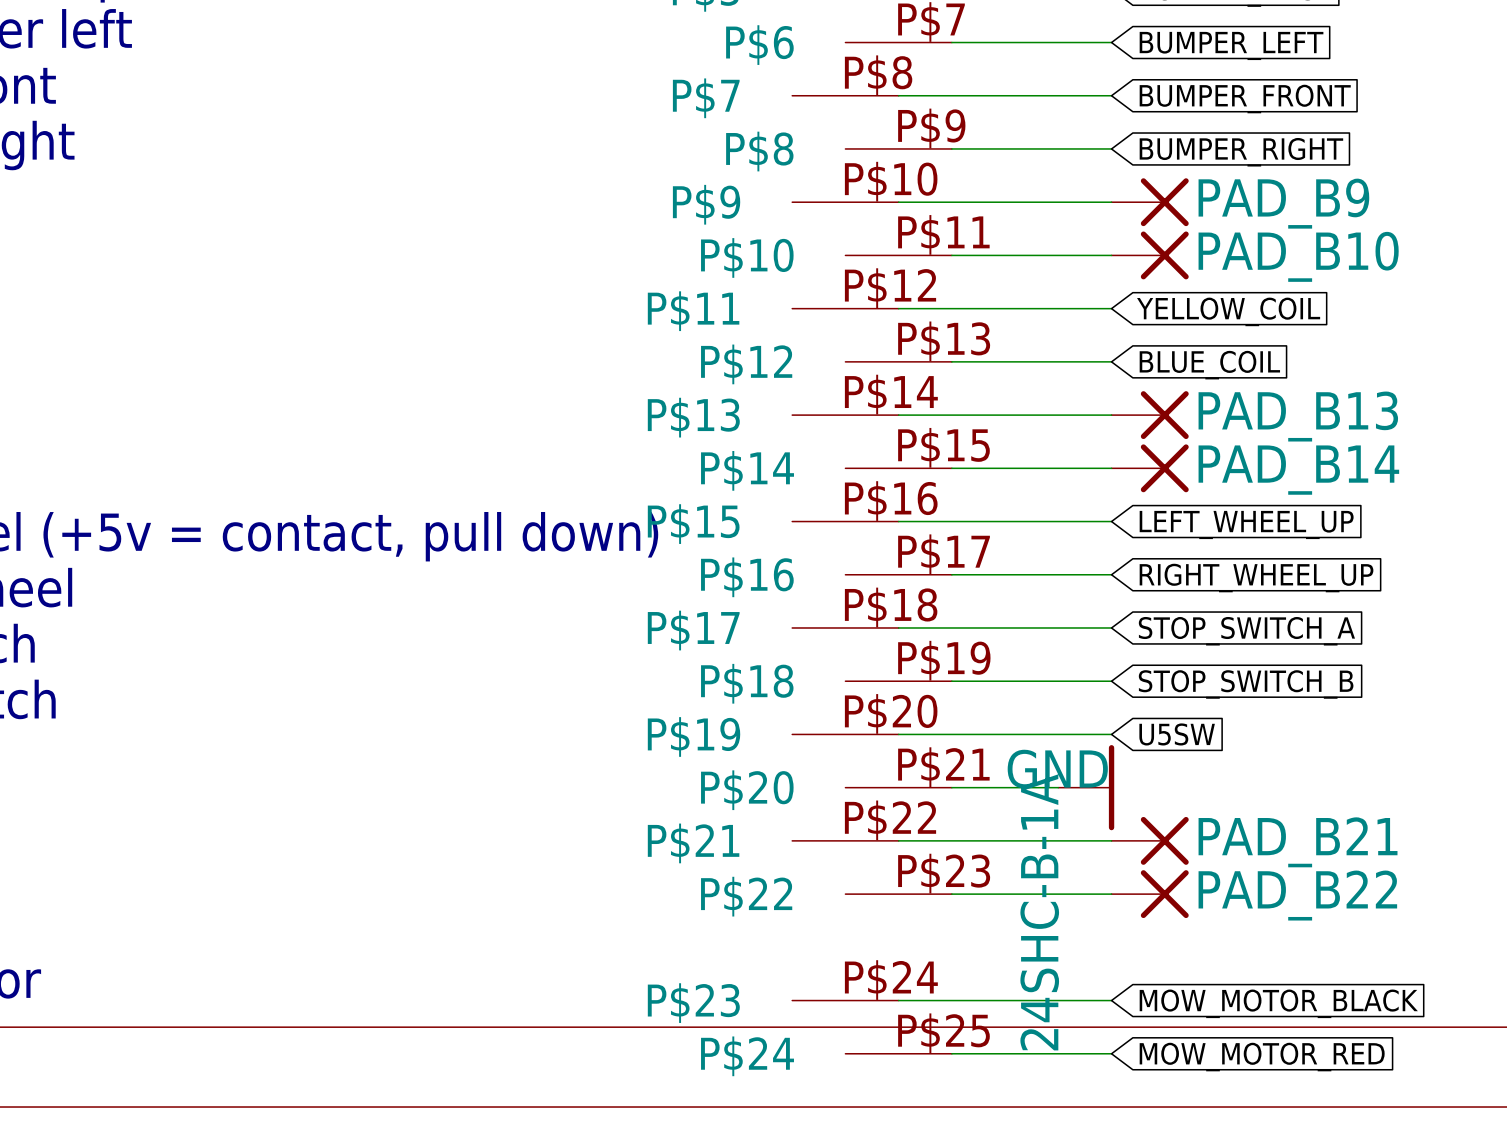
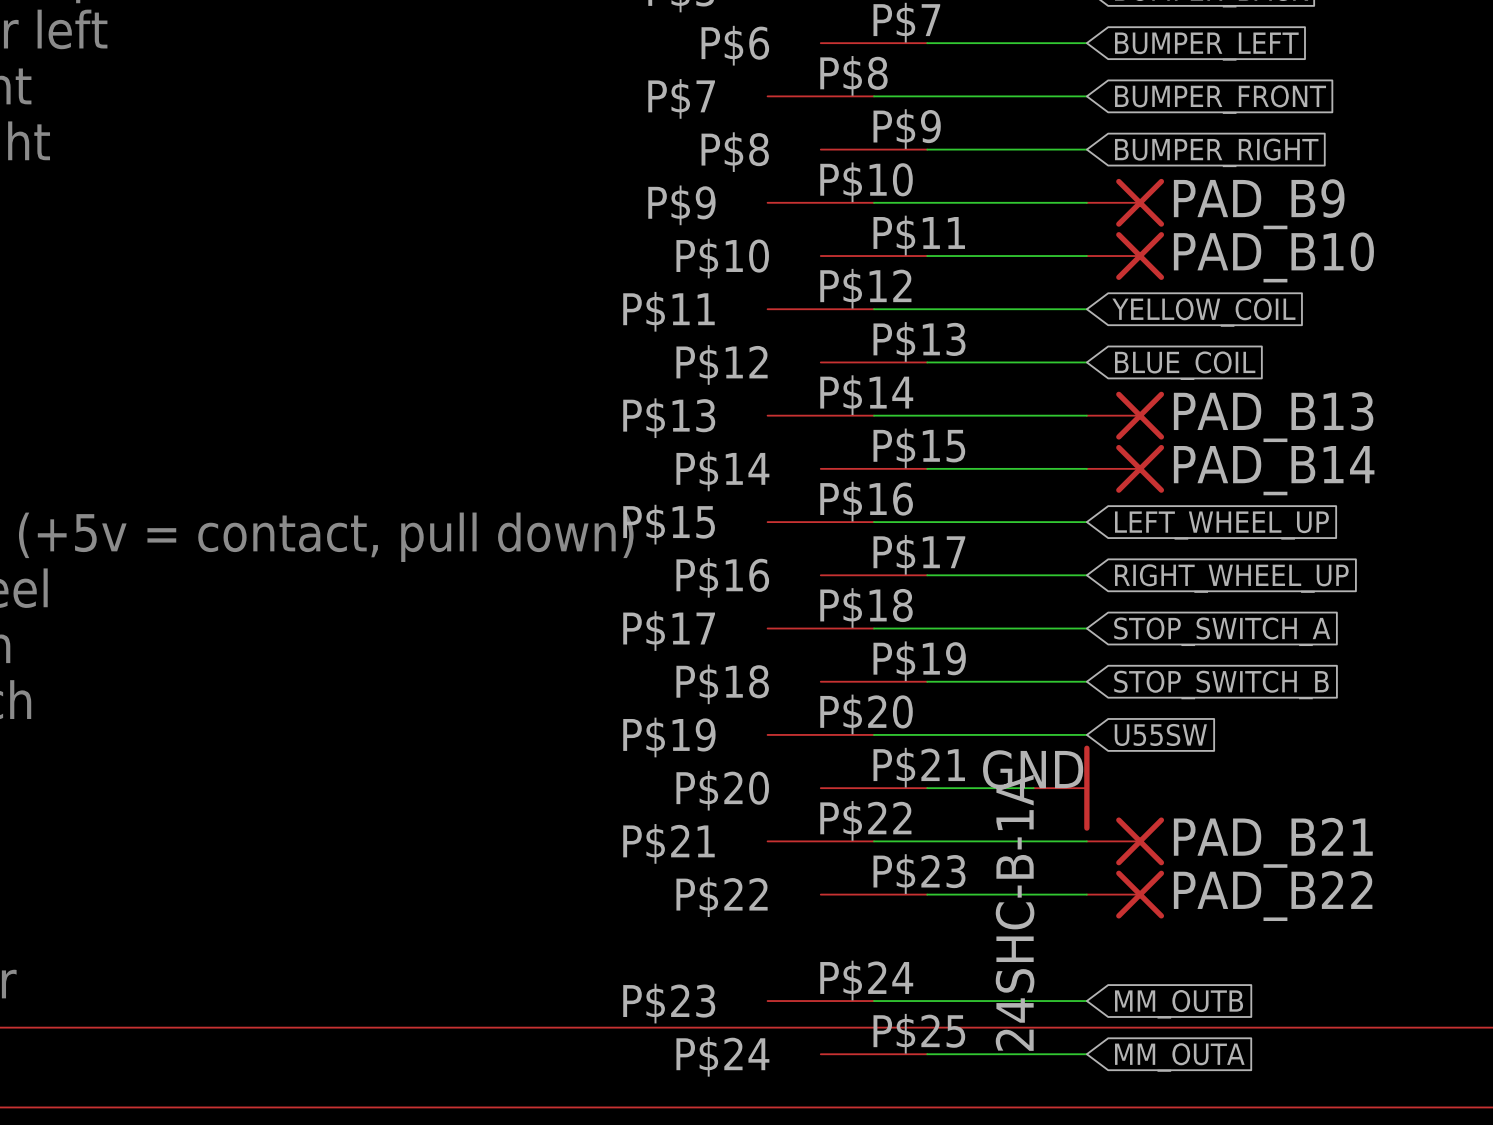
global label: U5SW (1177, 734) -> U55SW (1160, 734)
global label: MOW_MOTOR_BLACK (1278, 1003) -> MM_OUTB (1179, 1004)
global label: MOW_MOTOR_RED (1262, 1057) -> MM_OUTA (1179, 1057)

